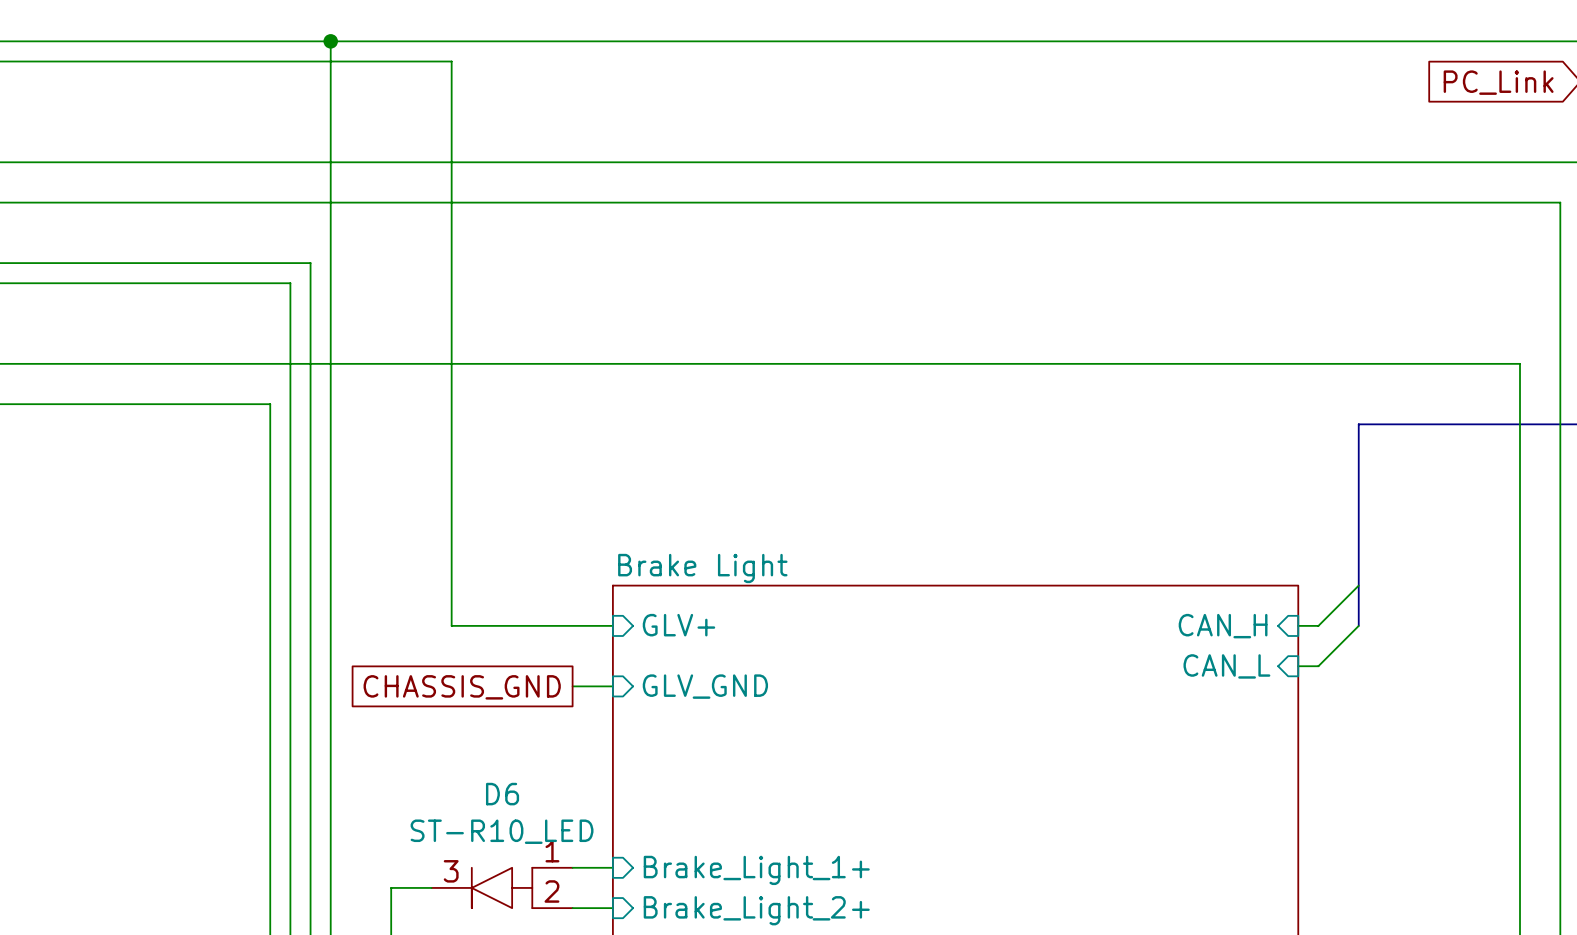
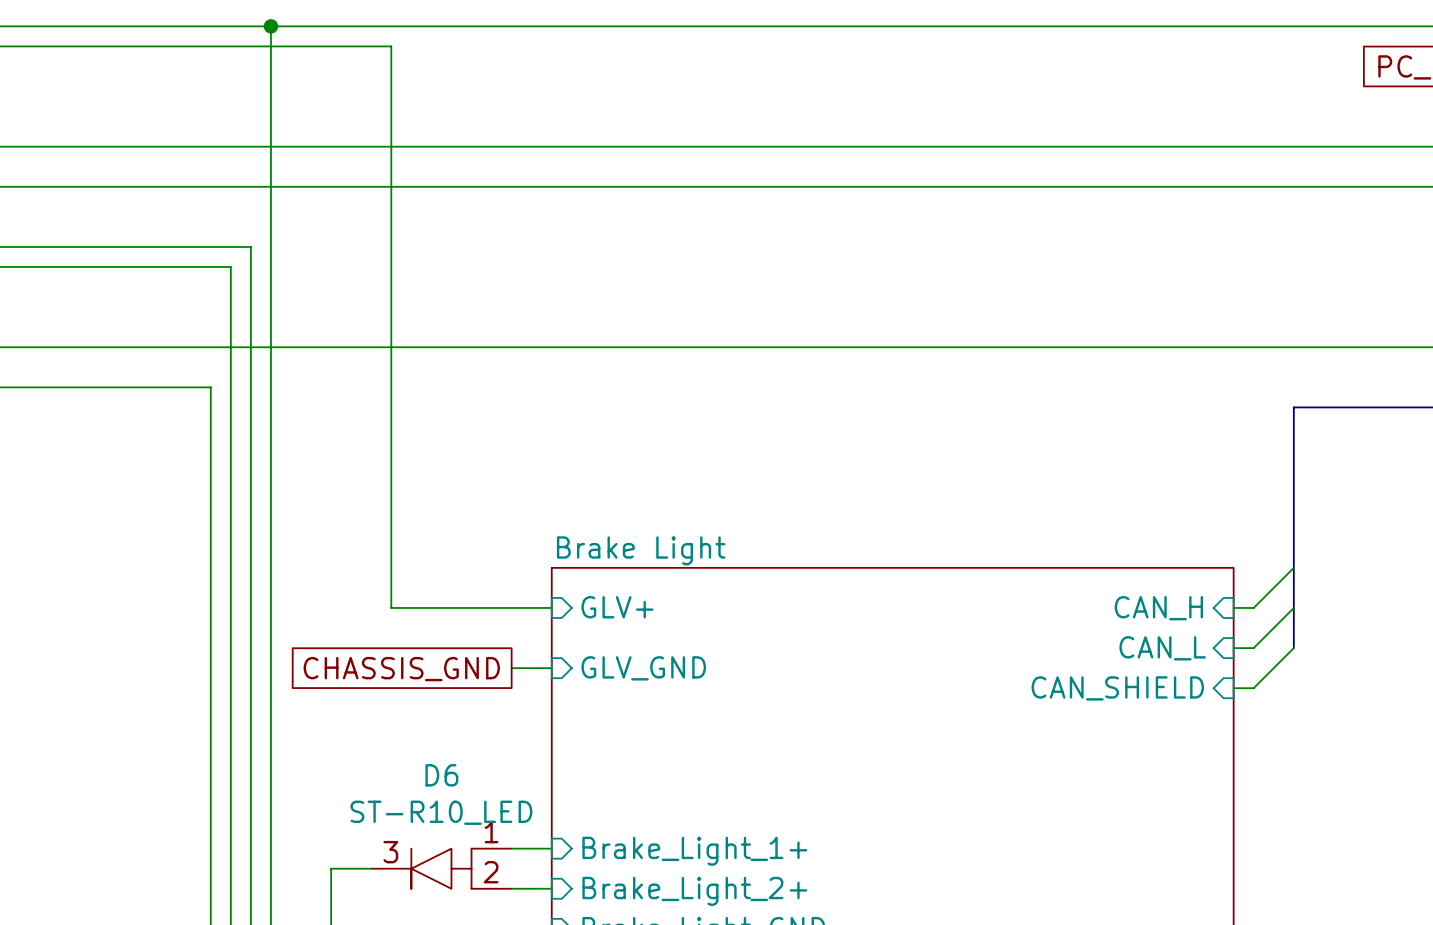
bus: none -> (1293, 607) (1293, 648)
wire: none -> (1293, 648) (1253, 688) (1233, 688)
sheet pin: none -> CAN_SHIELD (1117, 688)

